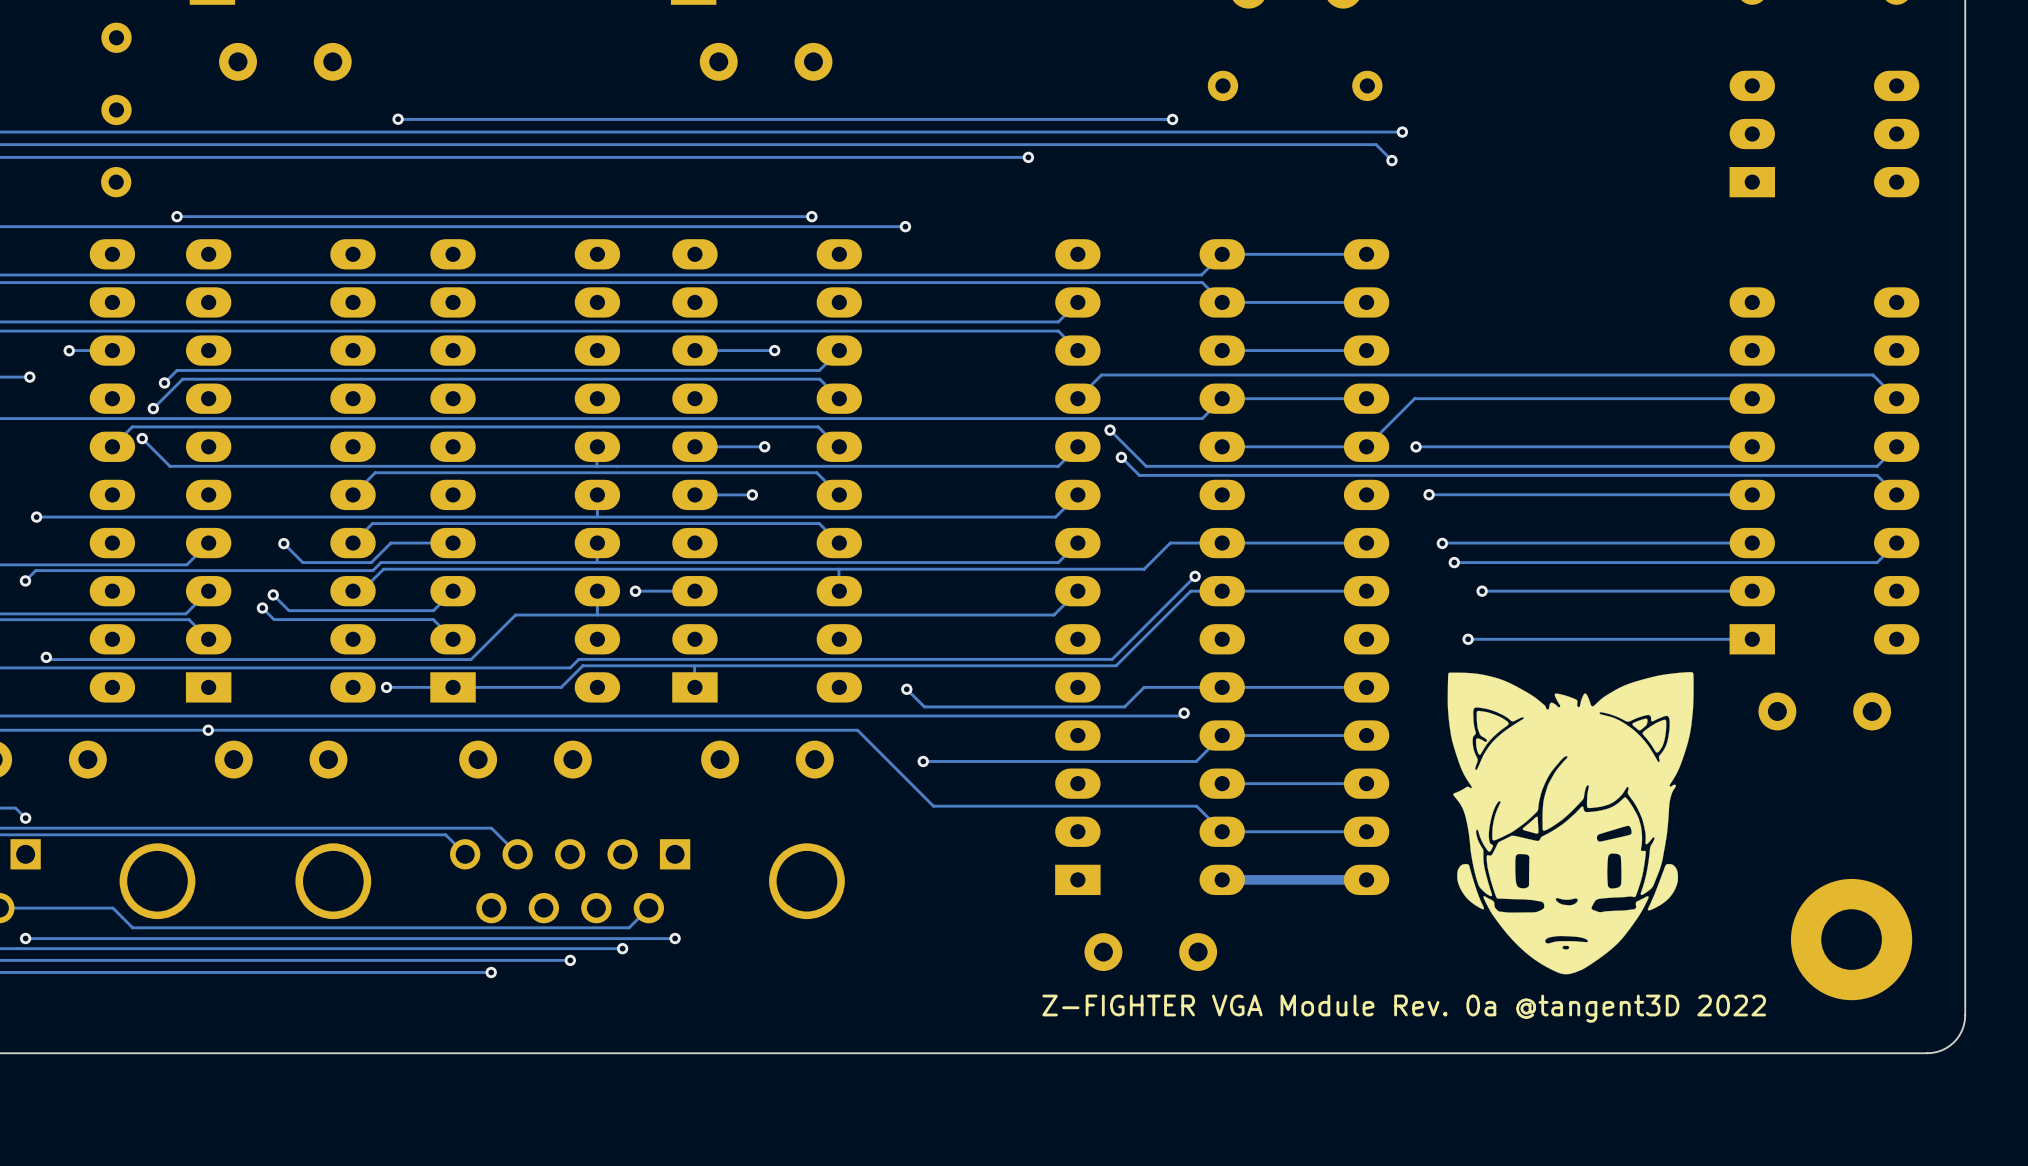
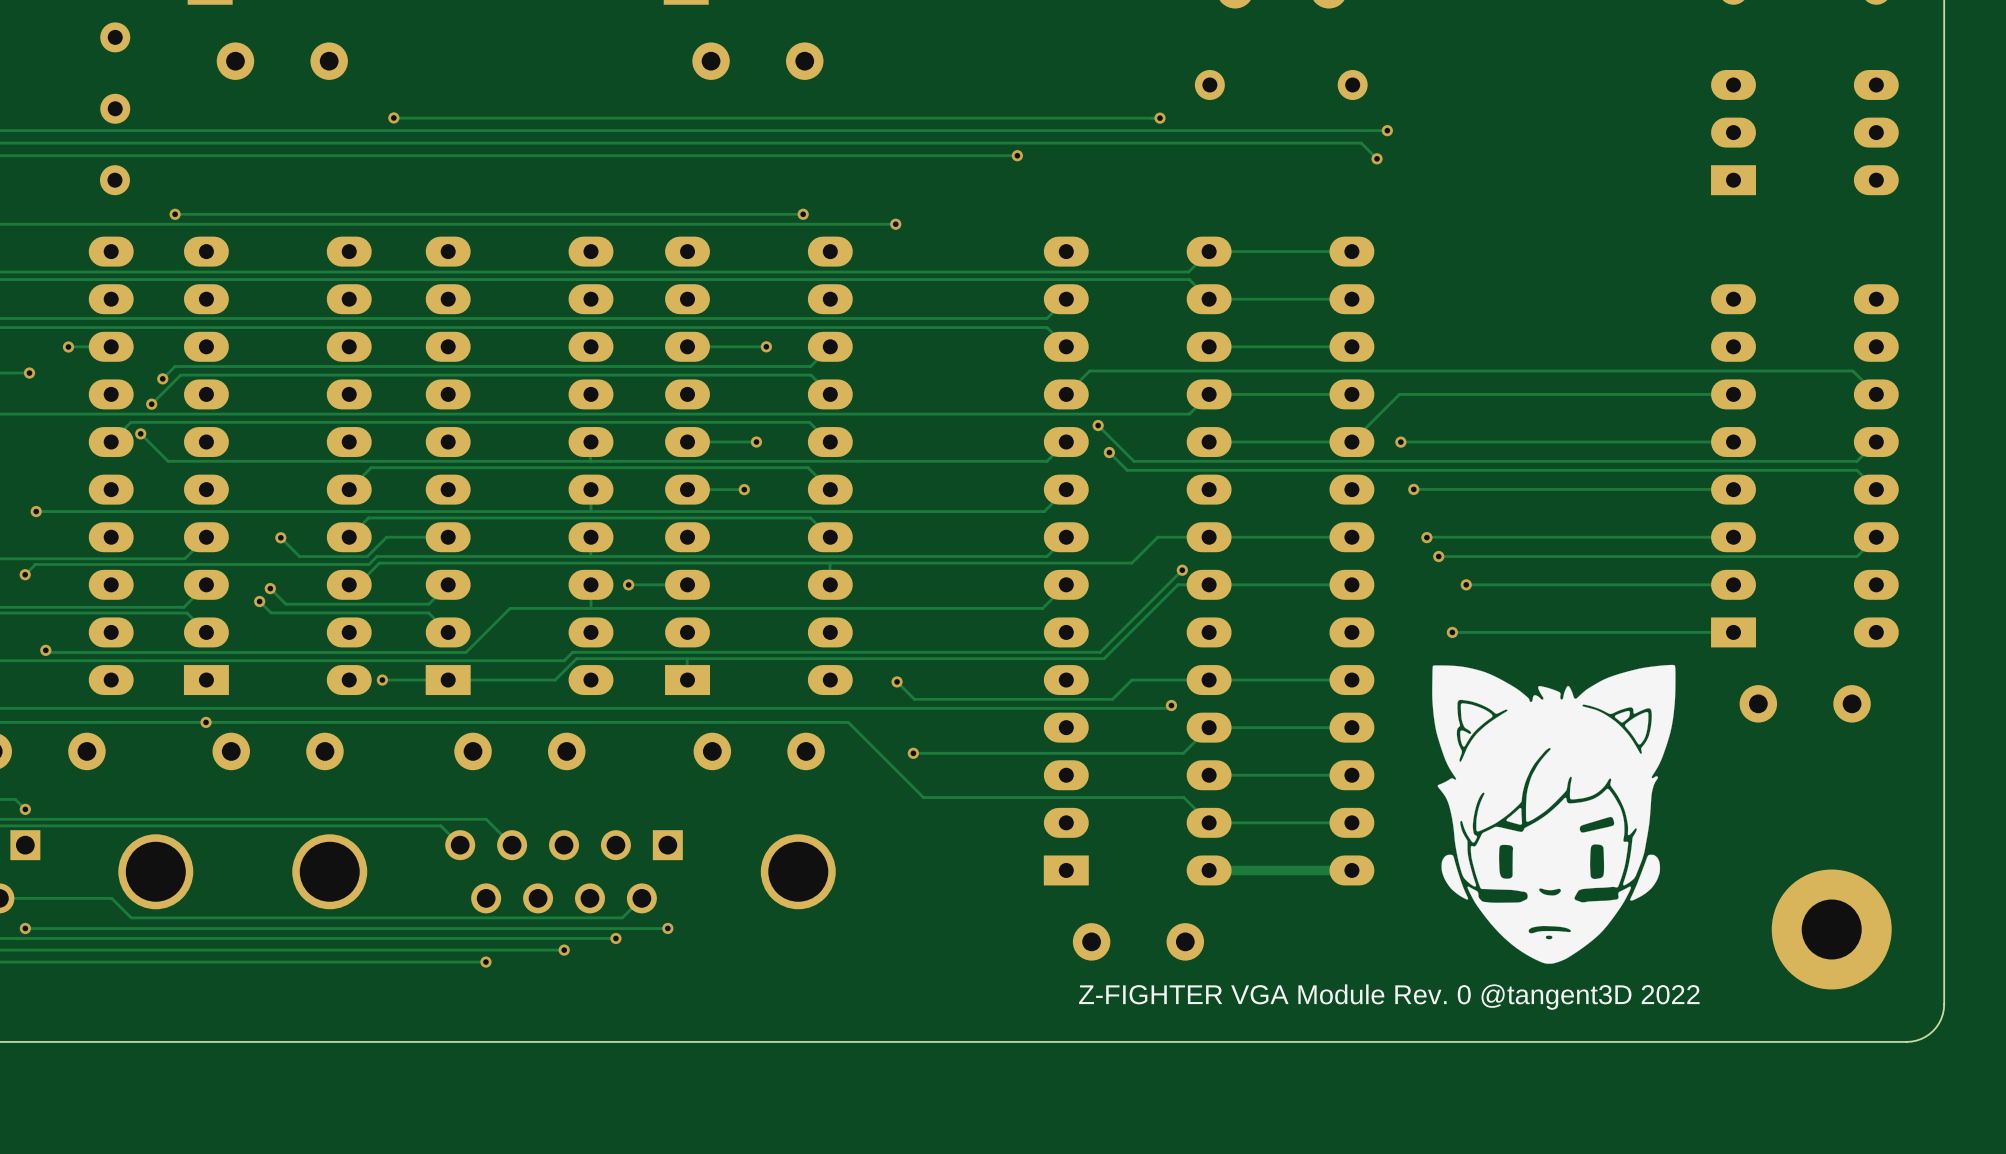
text: Z-FIGHTER VGA Module Rev. 0a @tangent3D 2022 (1404, 1008) -> Z-FIGHTER VGA Module Rev. 0 @tangent3D 2022 (1389, 997)

